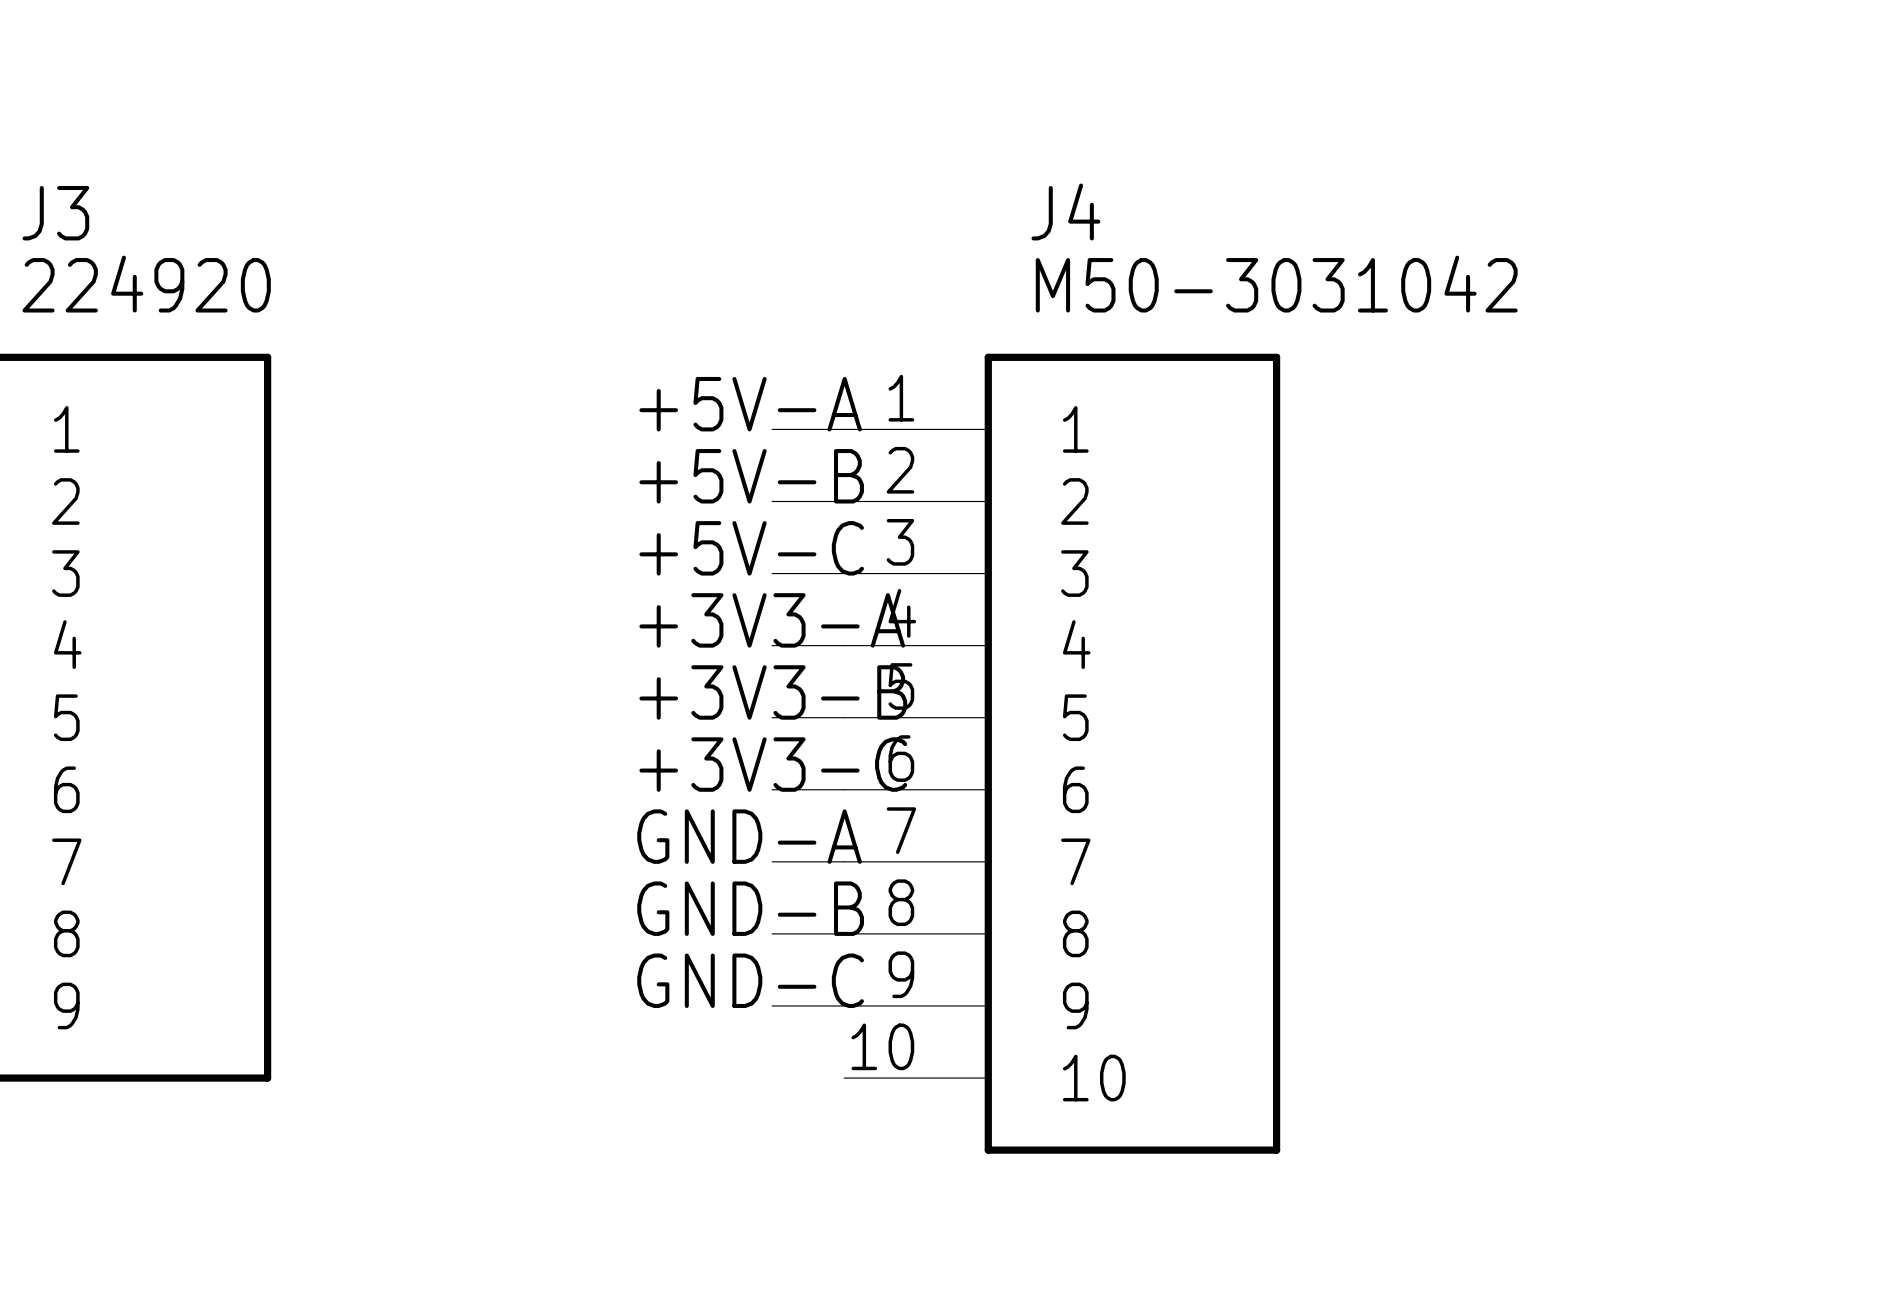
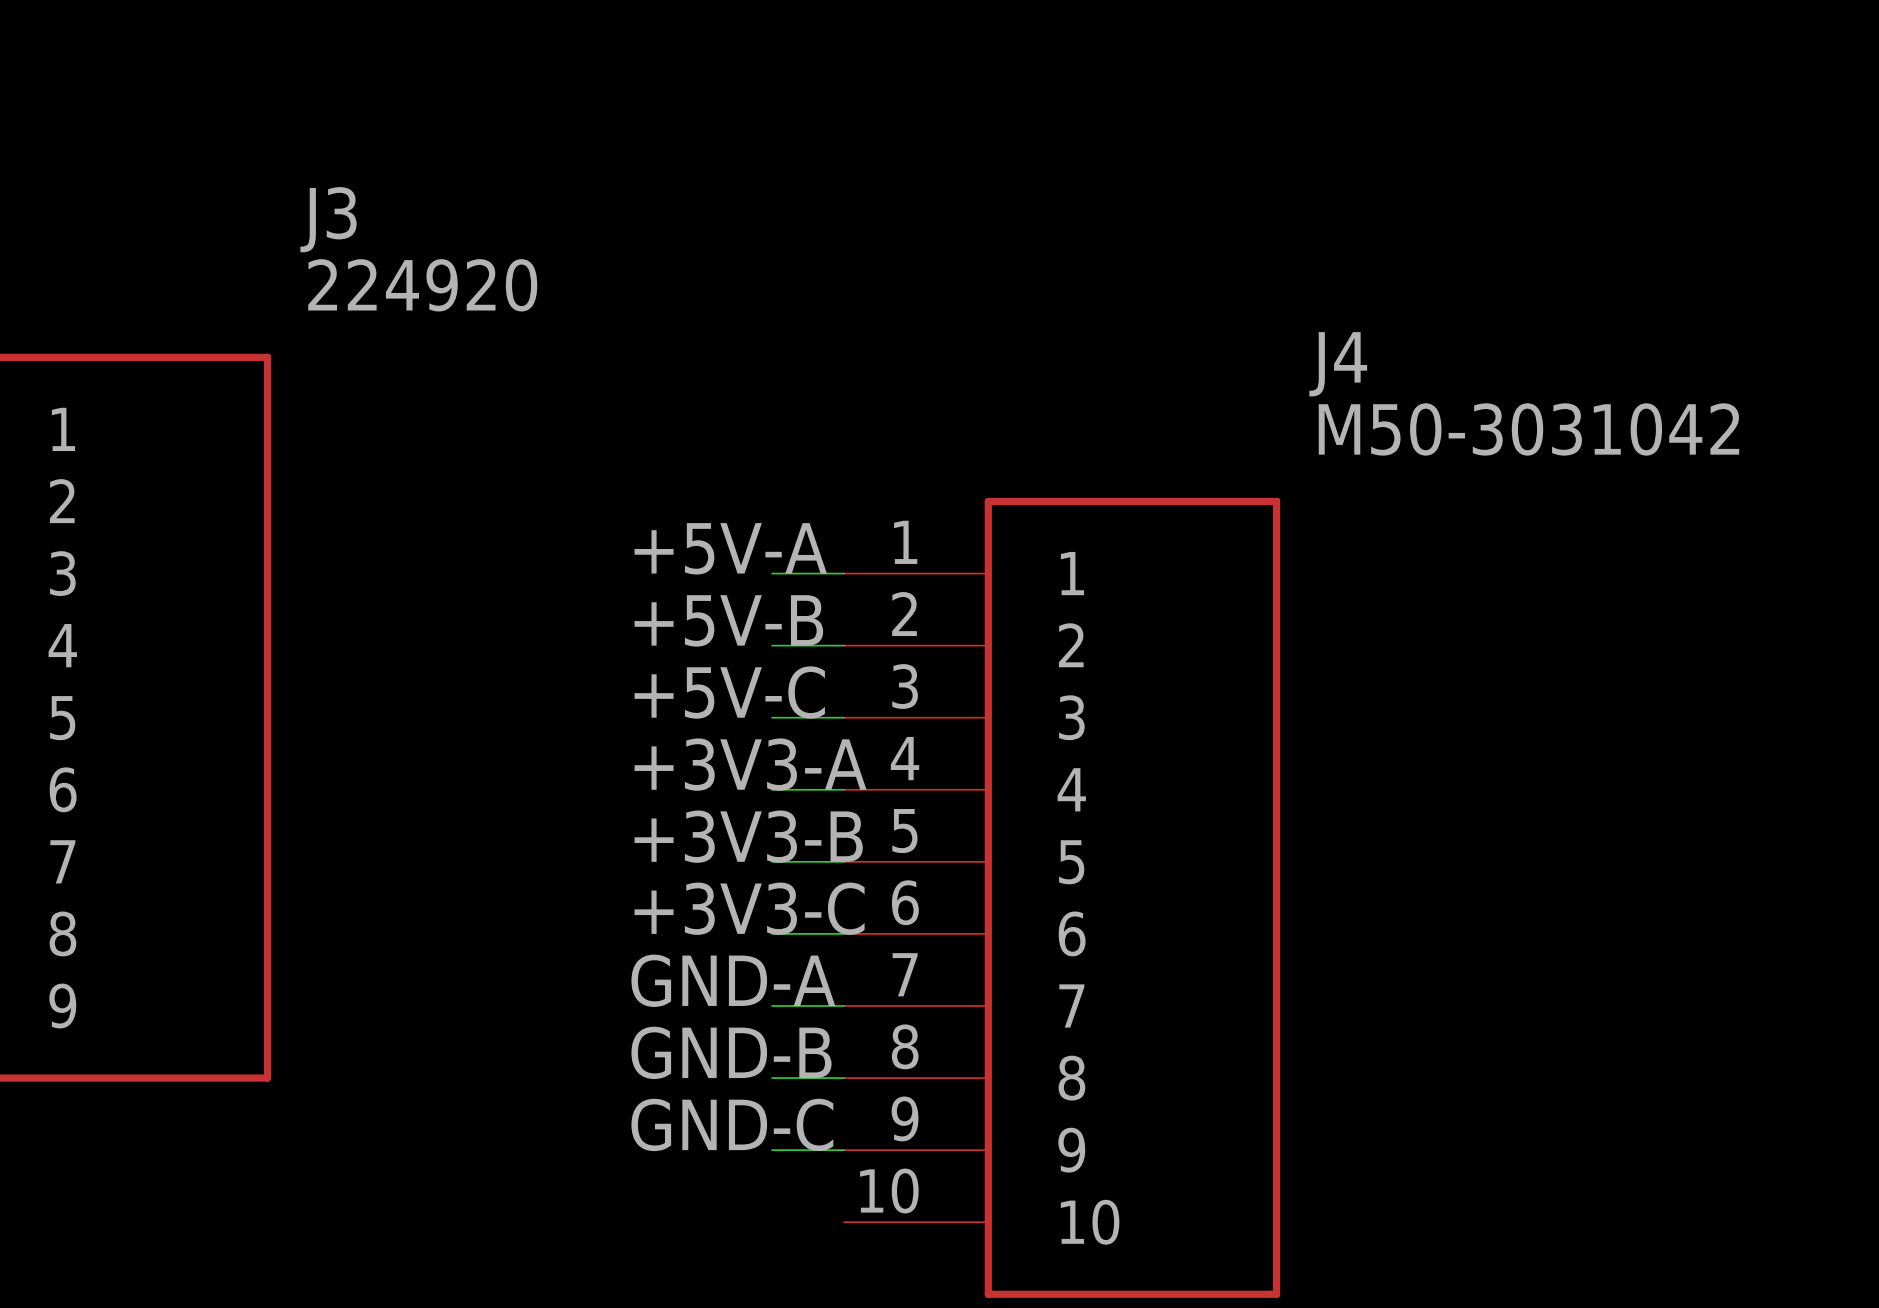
J4 name position: J4 (1065, 212) -> J4 (1338, 364)
J3 name position: J3 (55, 213) -> J3 (328, 219)
J3 value position: 224920 (146, 284) -> 224920 (422, 285)
J4 value position: M50-3031042 (1276, 284) -> M50-3031042 (1528, 429)
label: +5V-A (750, 404) -> none
wire: (772, 429) (844, 429) -> (772, 1078) (844, 1078)
label: +5V-B (751, 476) -> none
wire: (772, 501) (844, 501) -> (772, 1150) (844, 1150)
label: +5V-C (751, 548) -> +5V-A (730, 548)
label: +3V3-A (772, 620) -> +5V-B (728, 620)
label: +3V3-B (773, 692) -> +5V-C (729, 692)
J4 position: (1062, 753) -> (1062, 897)
label: +3V3-C (773, 764) -> +3V3-A (750, 764)
label: GND-A (749, 836) -> +3V3-B (748, 836)
label: GND-B (750, 908) -> +3V3-C (749, 908)
label: GND-C (750, 980) -> GND-A (733, 980)
label: none -> GND-B (731, 1052)
label: none -> GND-C (732, 1124)

